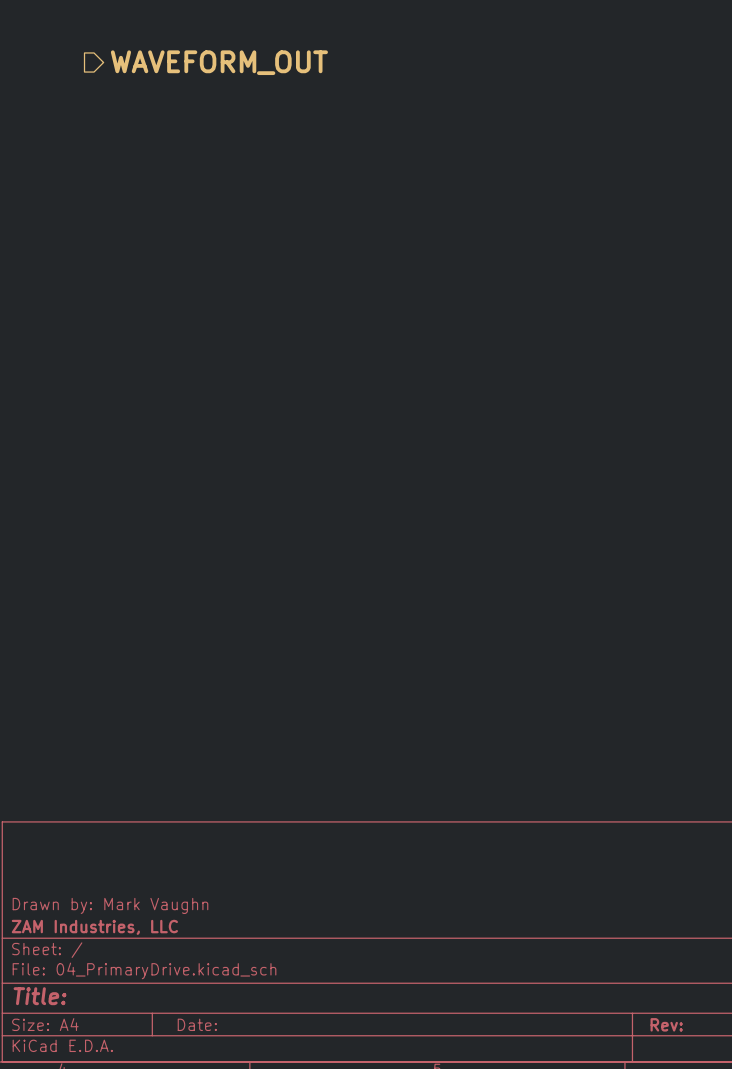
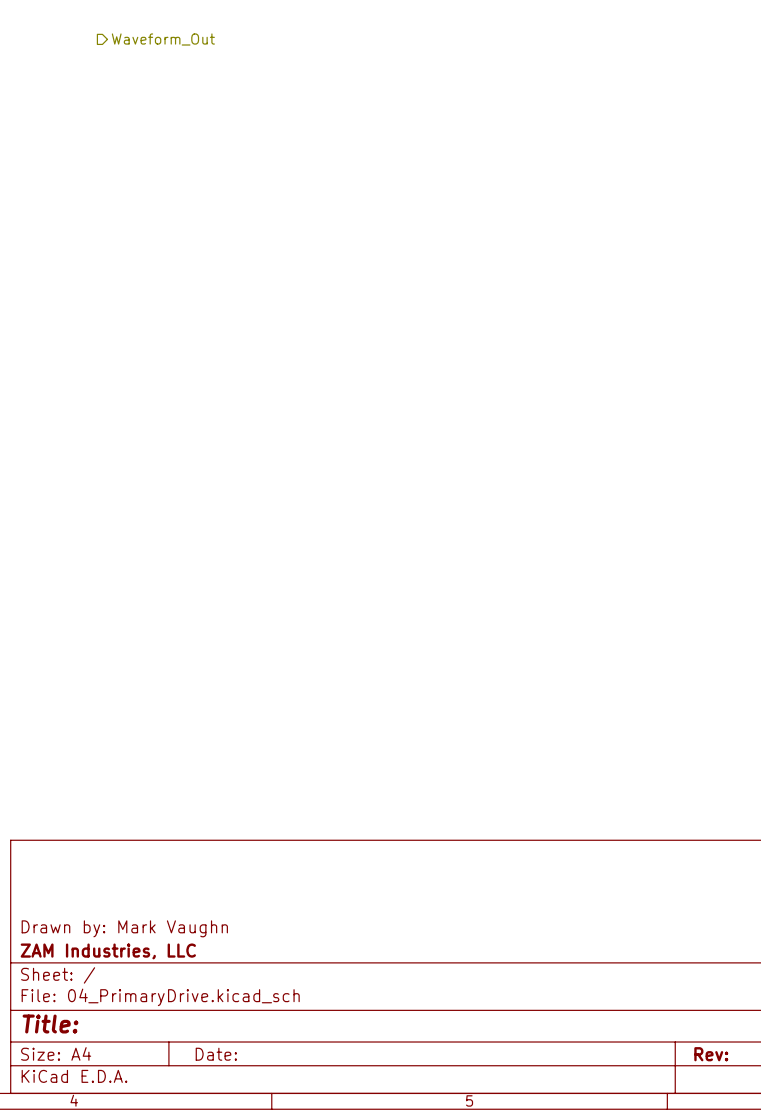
hierarchical label: none -> Waveform_Out (163, 39)
hierarchical label: WAVEFORM_OUT (219, 62) -> none

